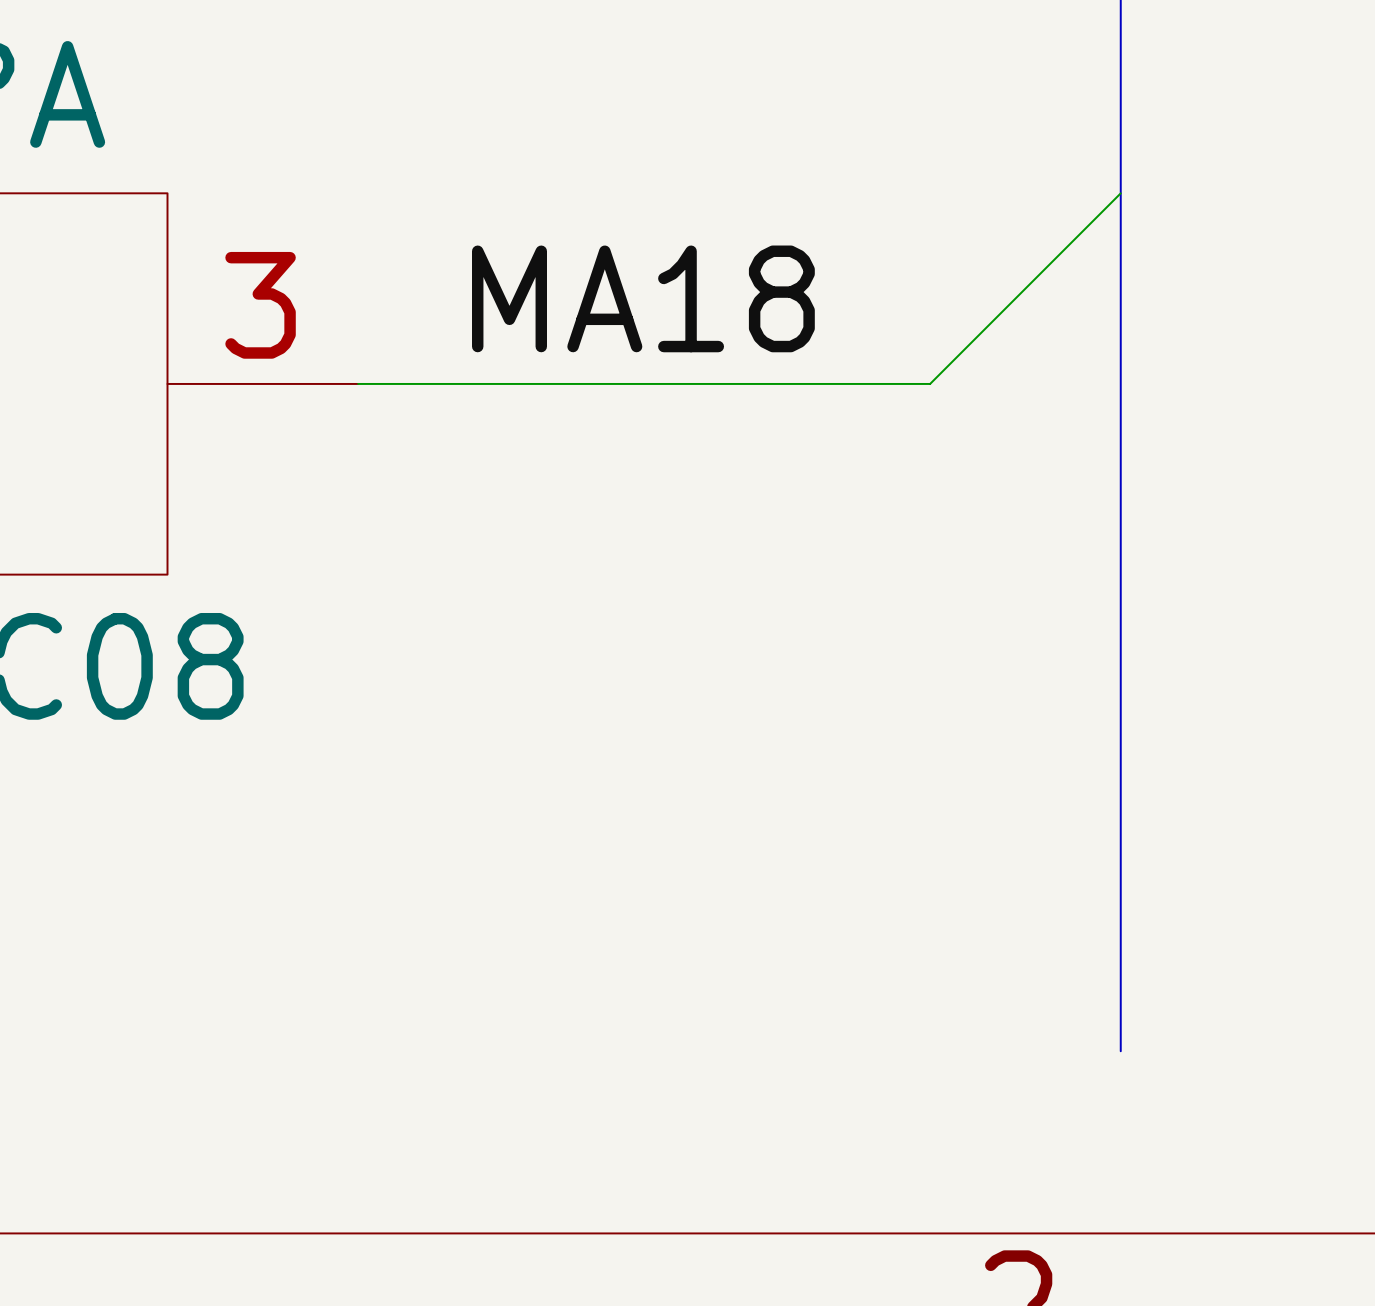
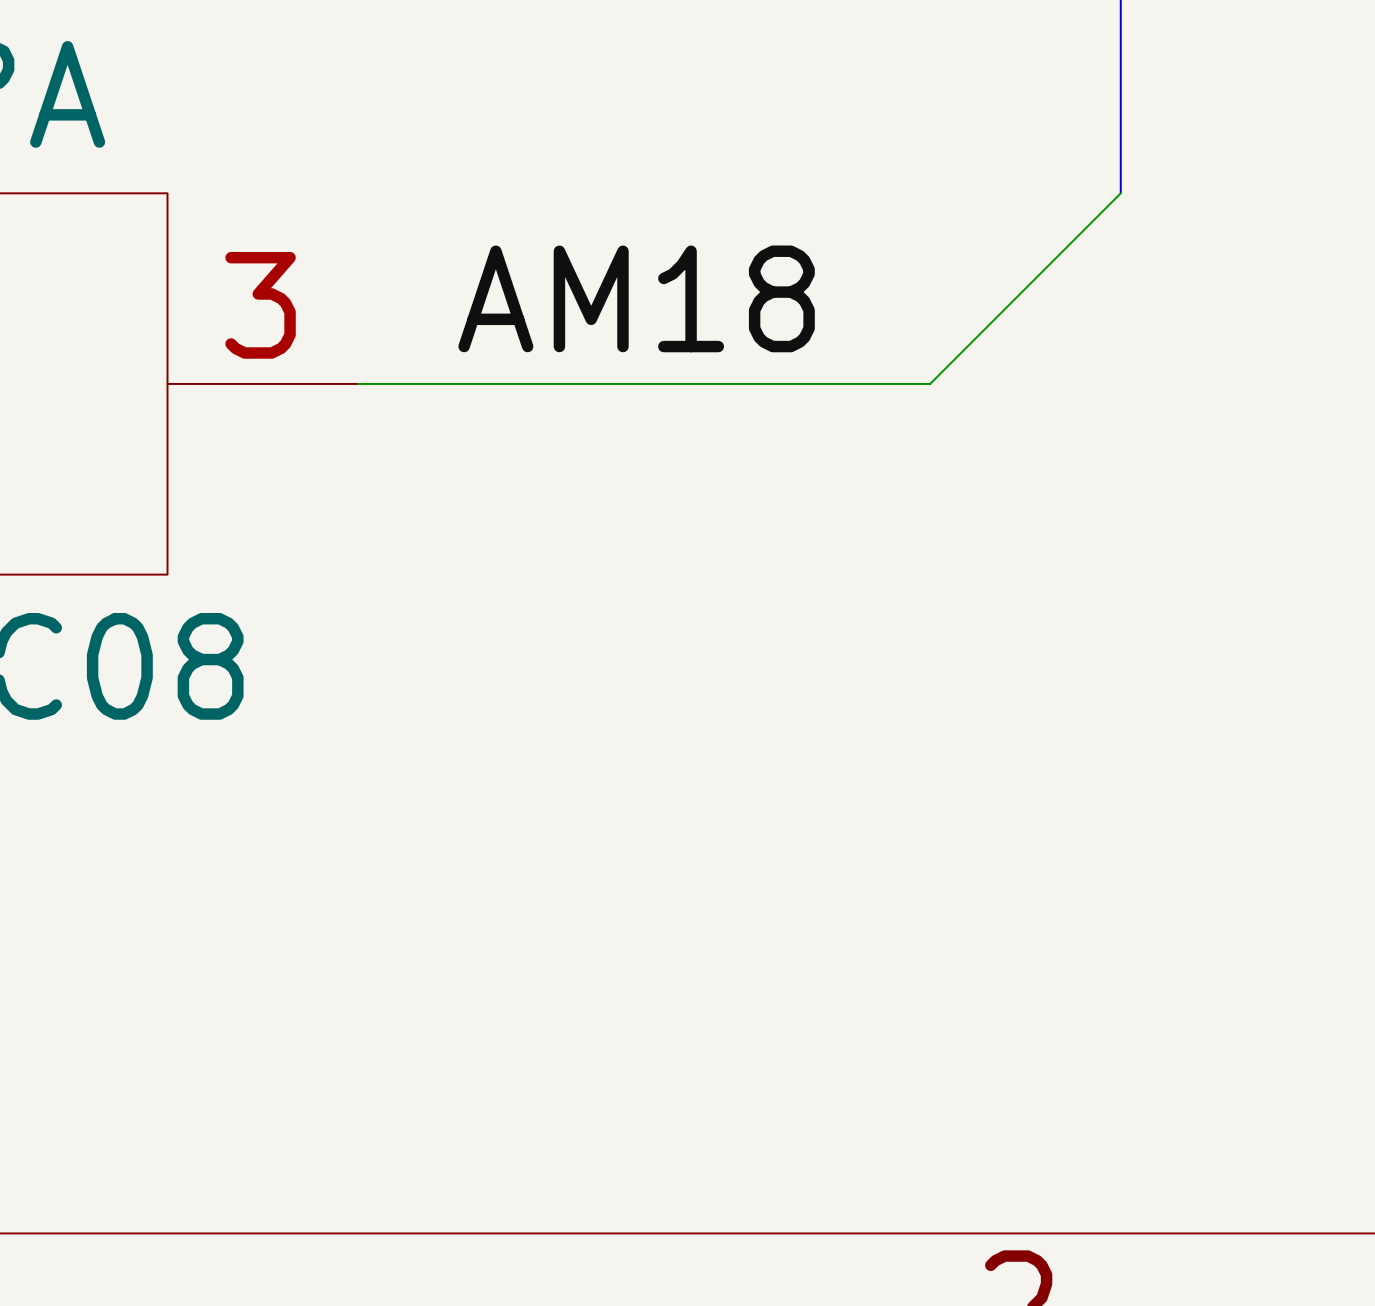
bus: (1120, 193) (1120, 1051) -> none
label: MA18 (643, 298) -> AM18 (636, 298)

